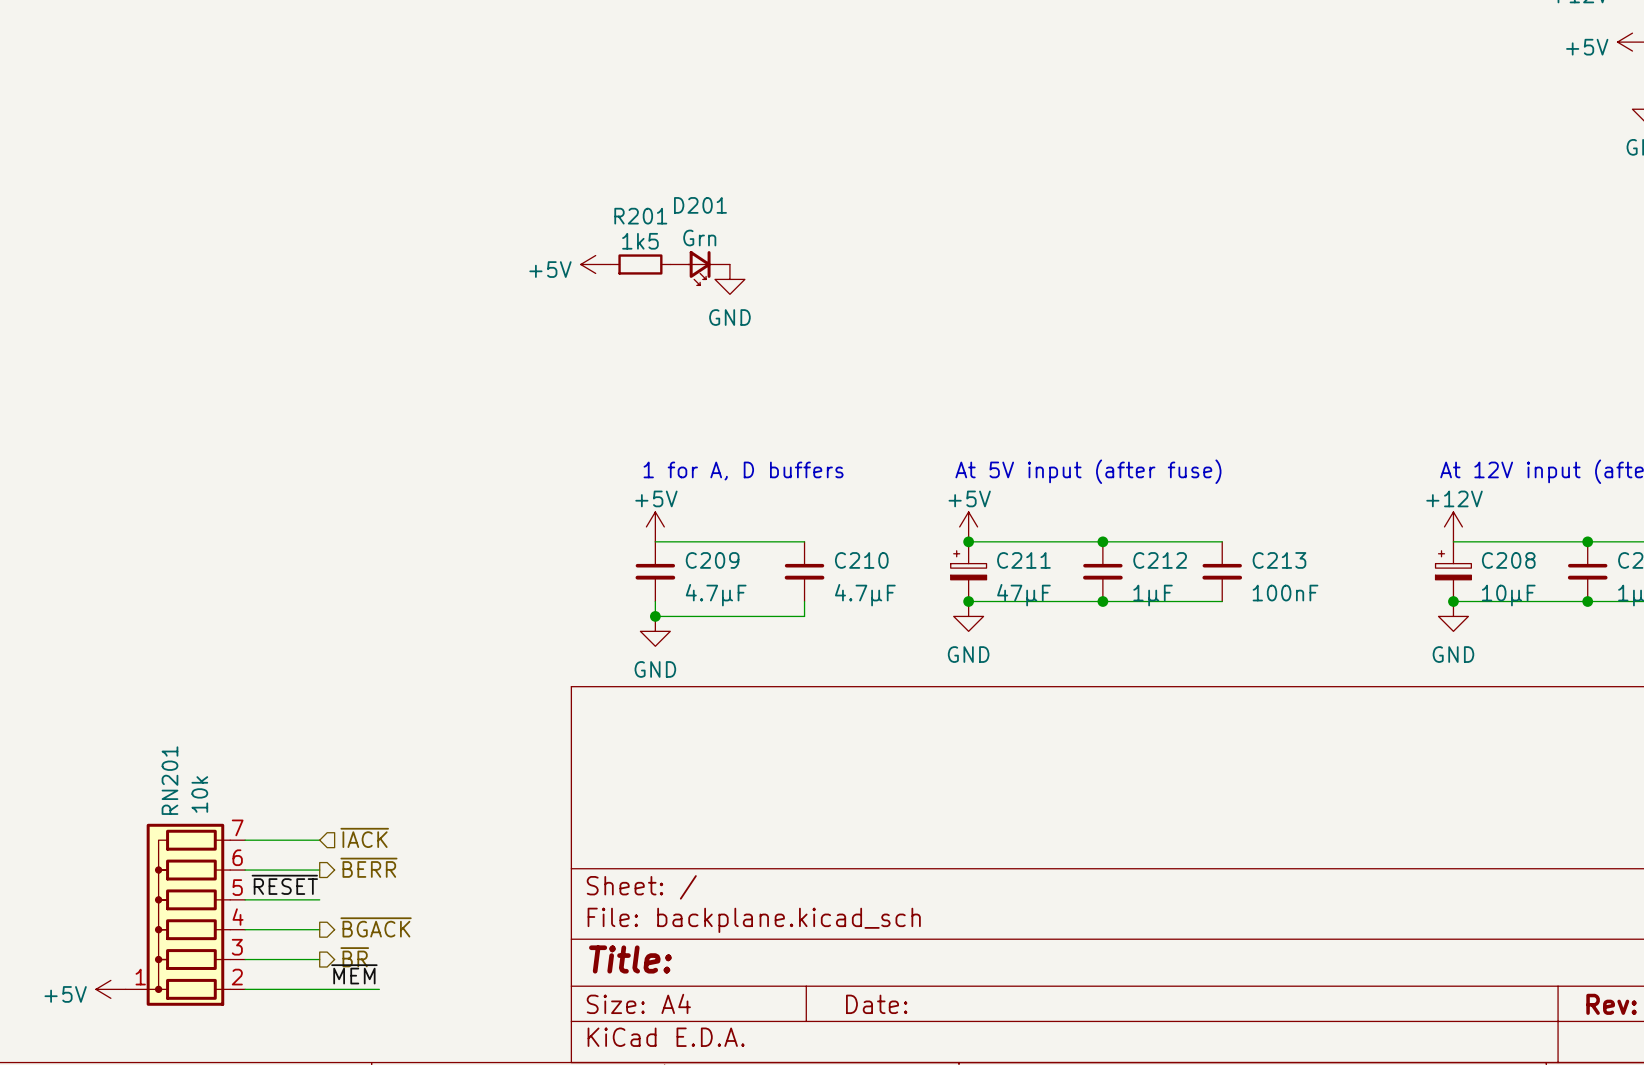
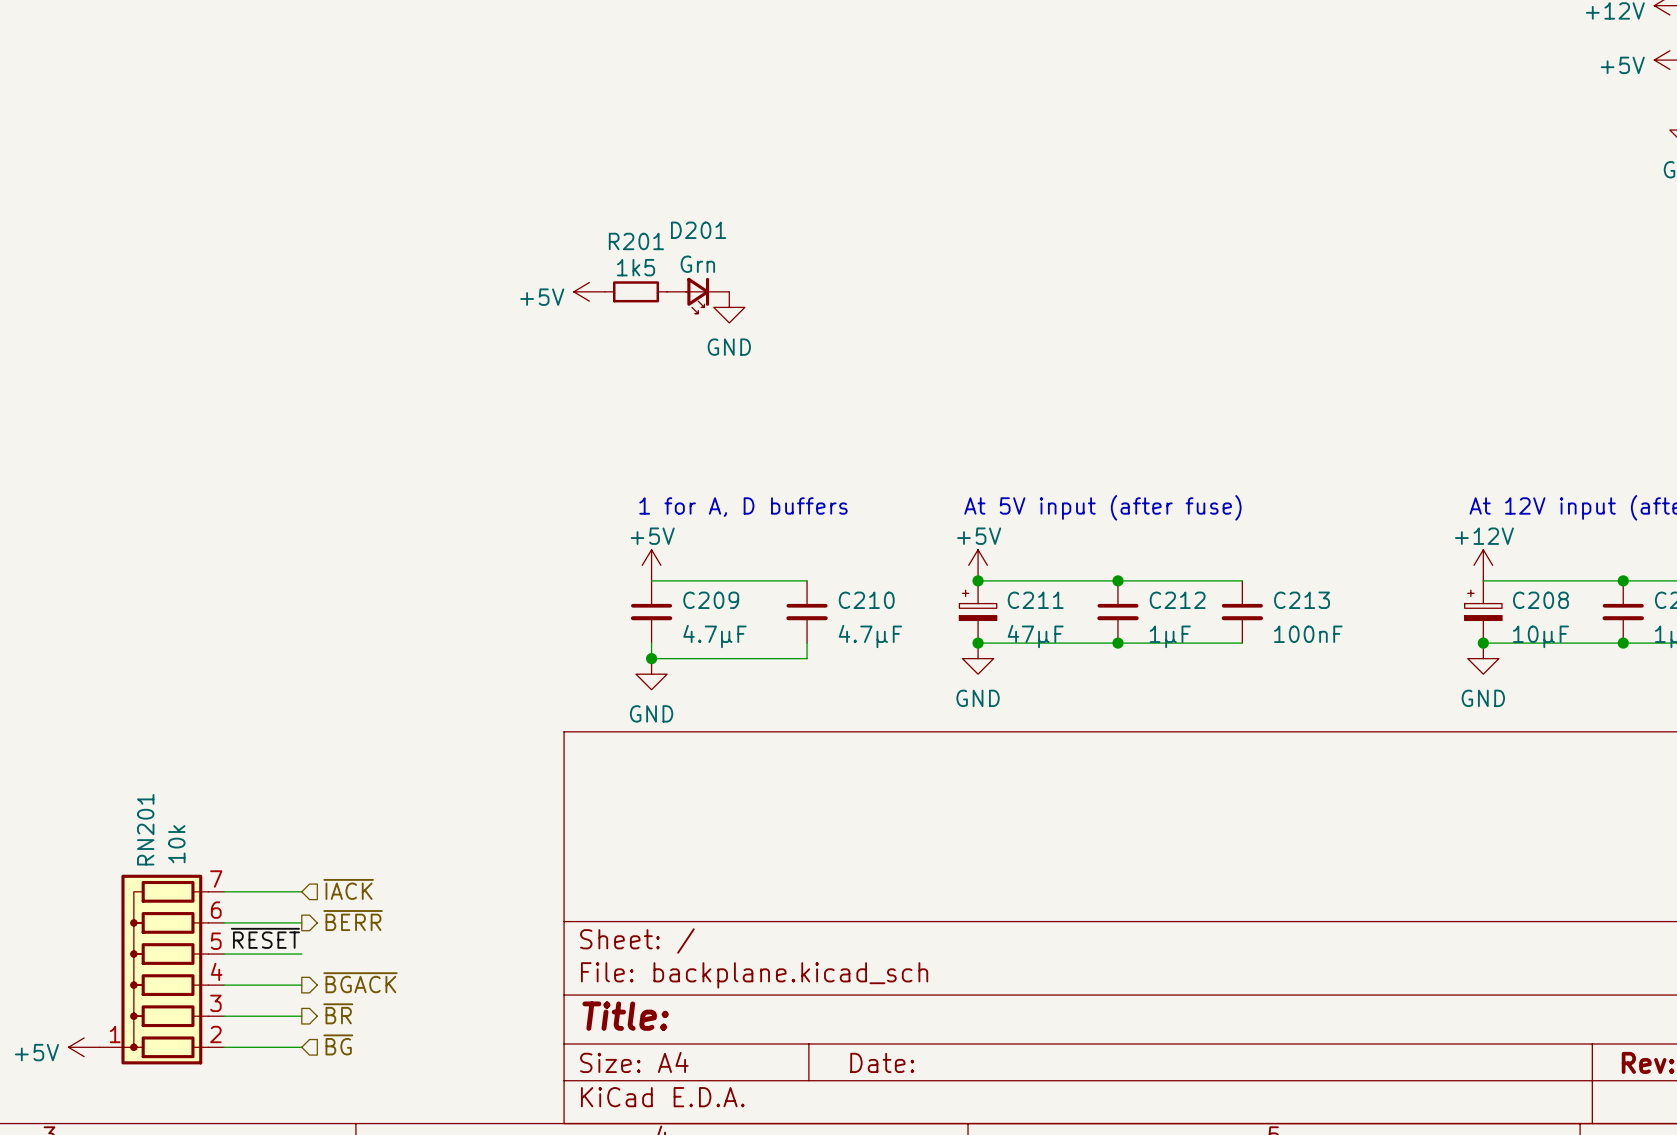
label: ~{MEM} (354, 974) -> none
hierarchical label: none -> ~{BG} (338, 1044)
wire: (319, 989) (379, 989) -> none

